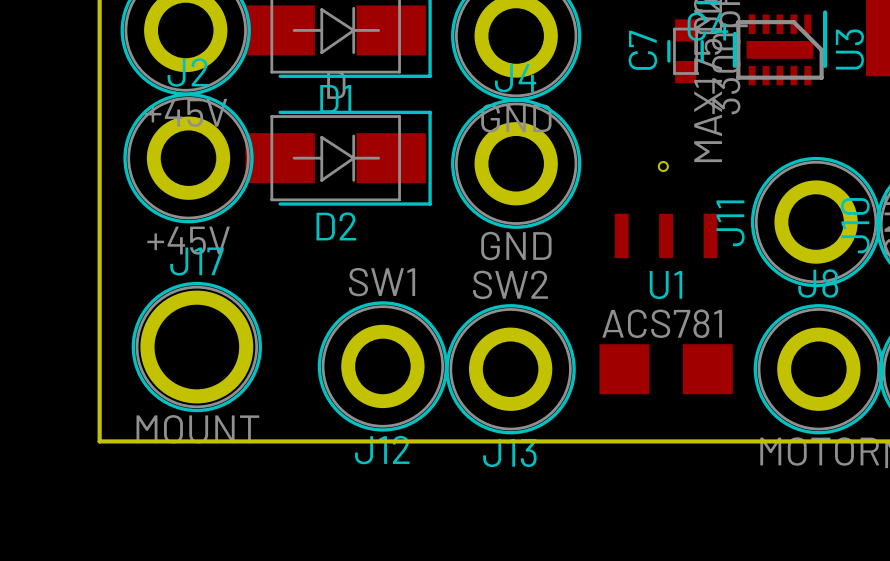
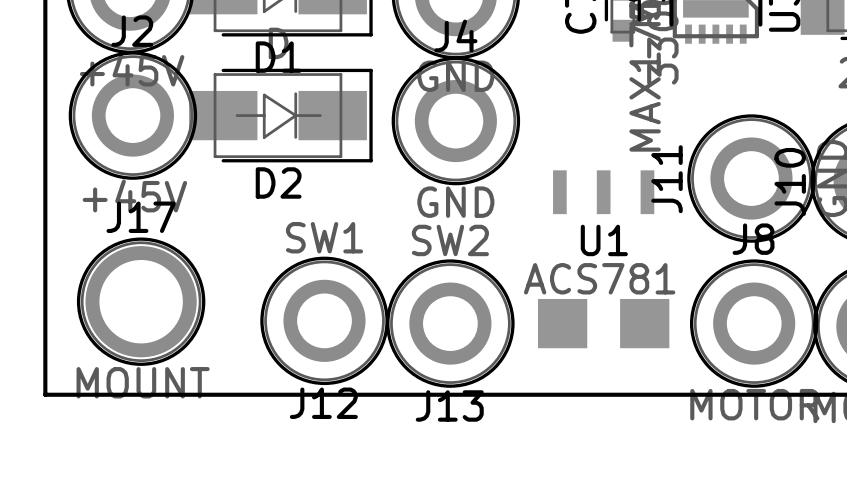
part: (663, 166) -> none

